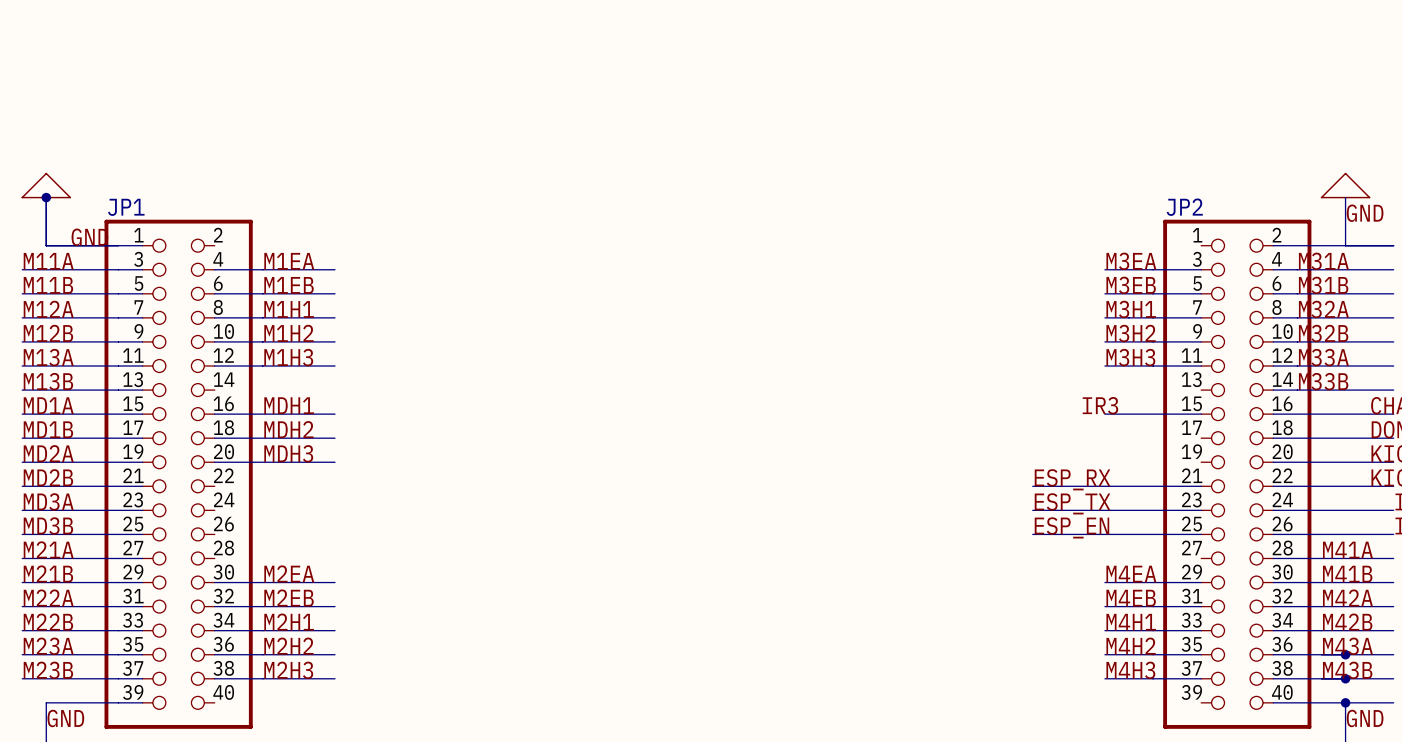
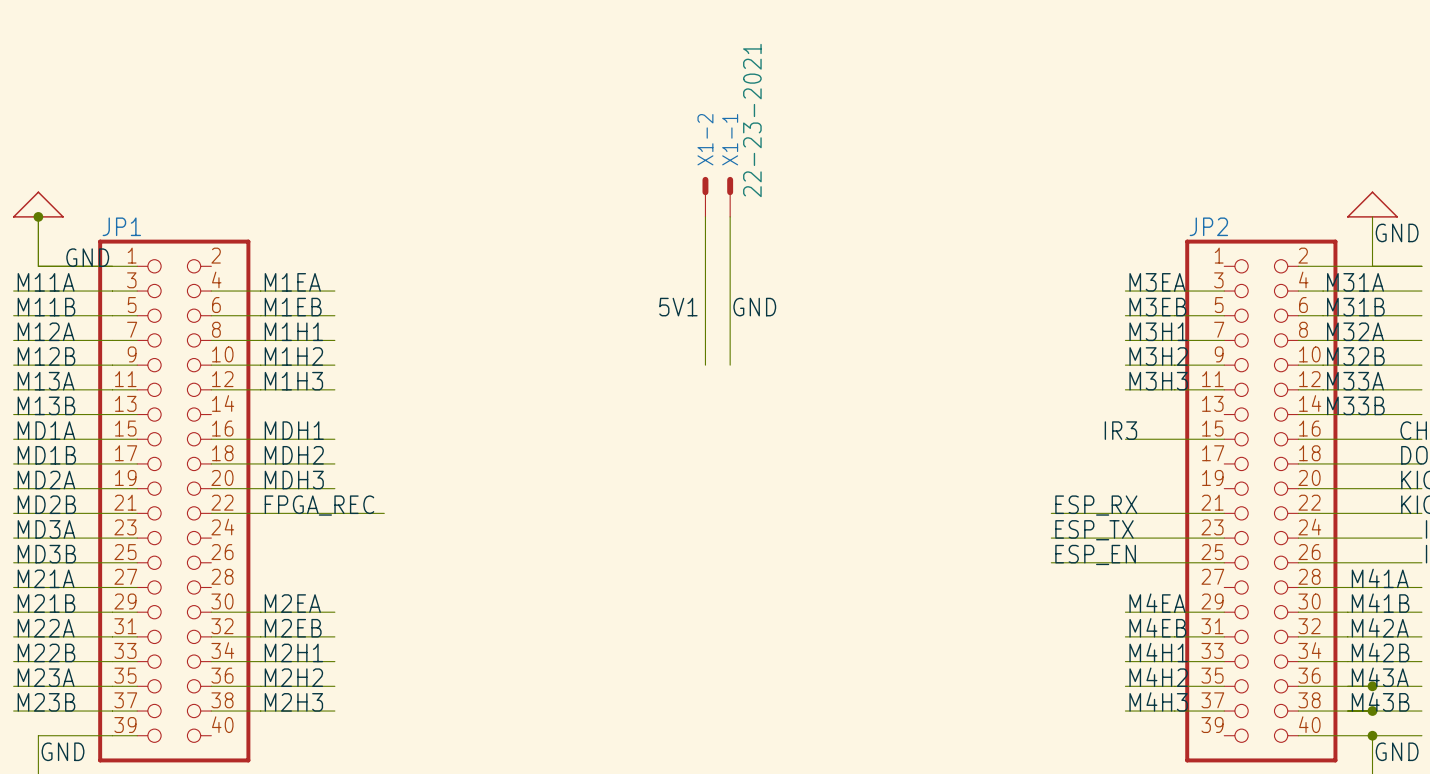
X1-2: none -> (705, 196)
X1-1: none -> 22-23-2021 (730, 196)
wire: none -> (705, 216) (705, 365)
wire: none -> (730, 216) (730, 365)
label: none -> 5V1 (678, 307)
label: none -> GND (754, 307)
label: none -> FPGA_REC (319, 505)
wire: none -> (211, 513) (384, 513)

